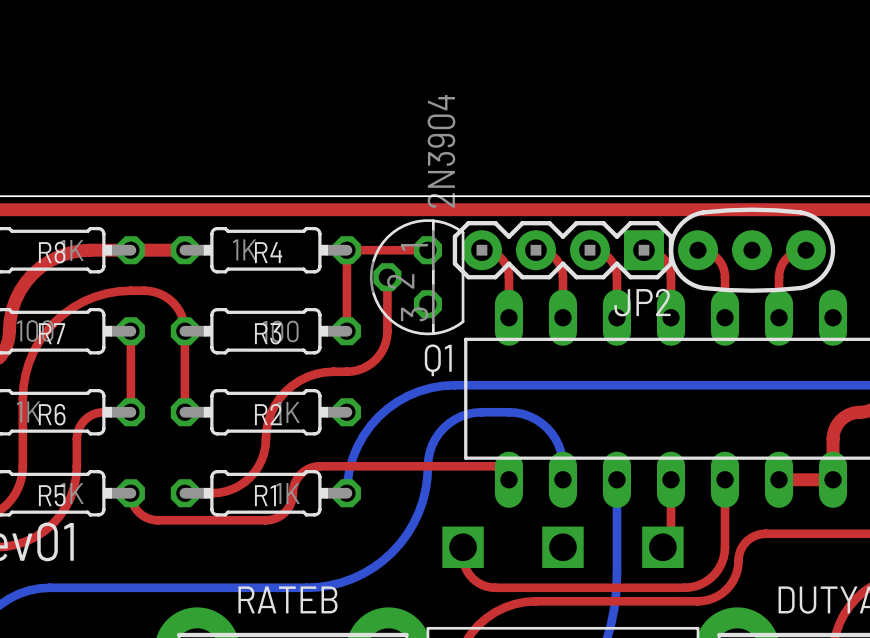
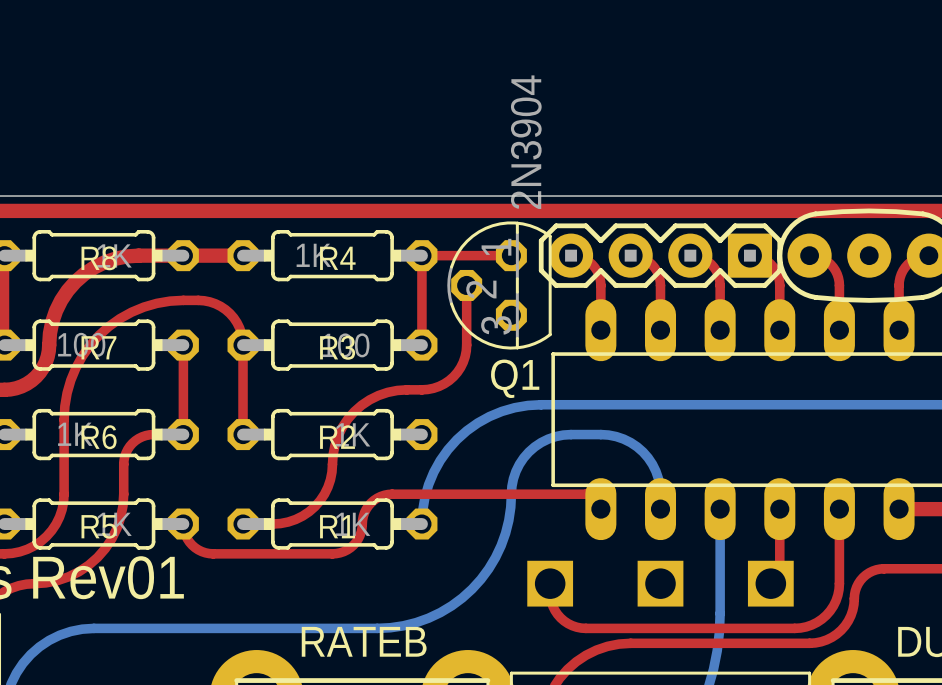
JP2 name: JP2 (642, 302) -> none

